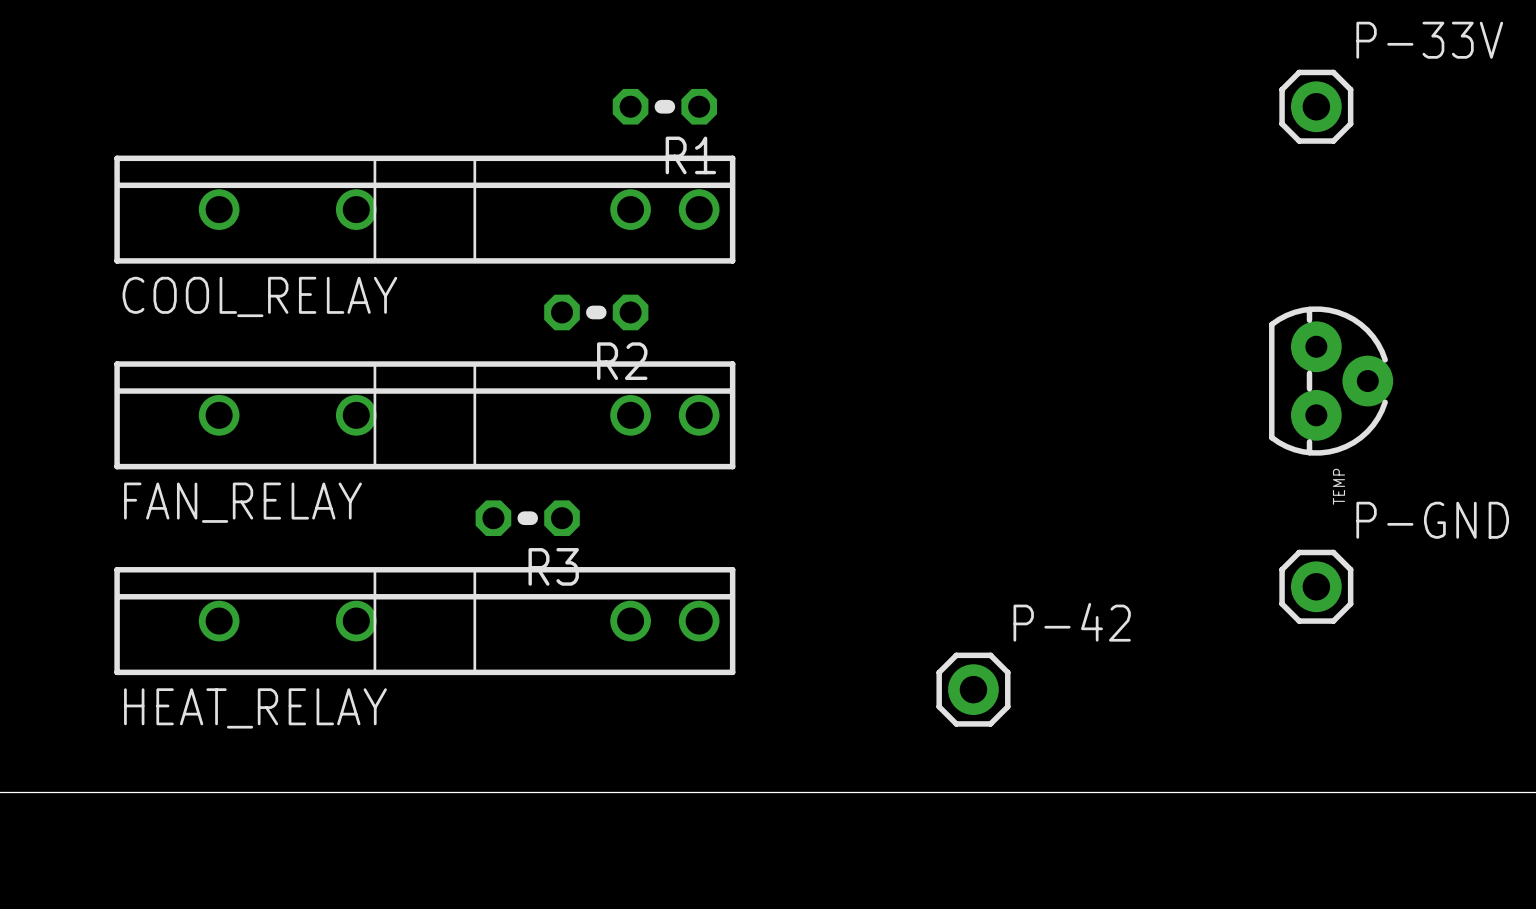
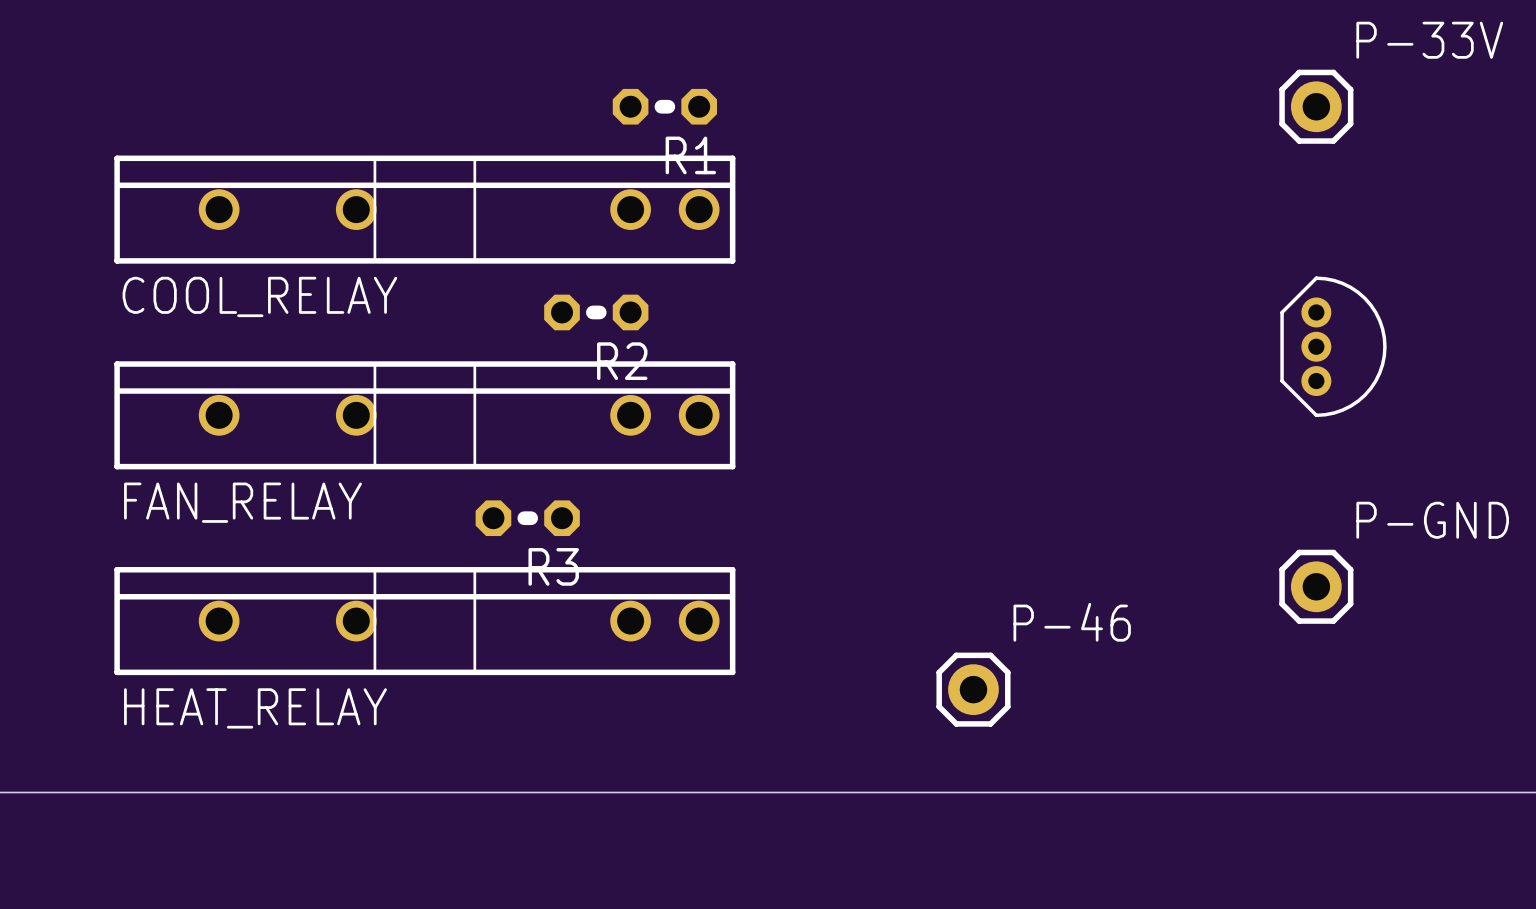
part: none -> (1333, 346)
TEMP: (1331, 381) -> none
P-42 name: P-42 (1072, 622) -> P-46 (1072, 622)

